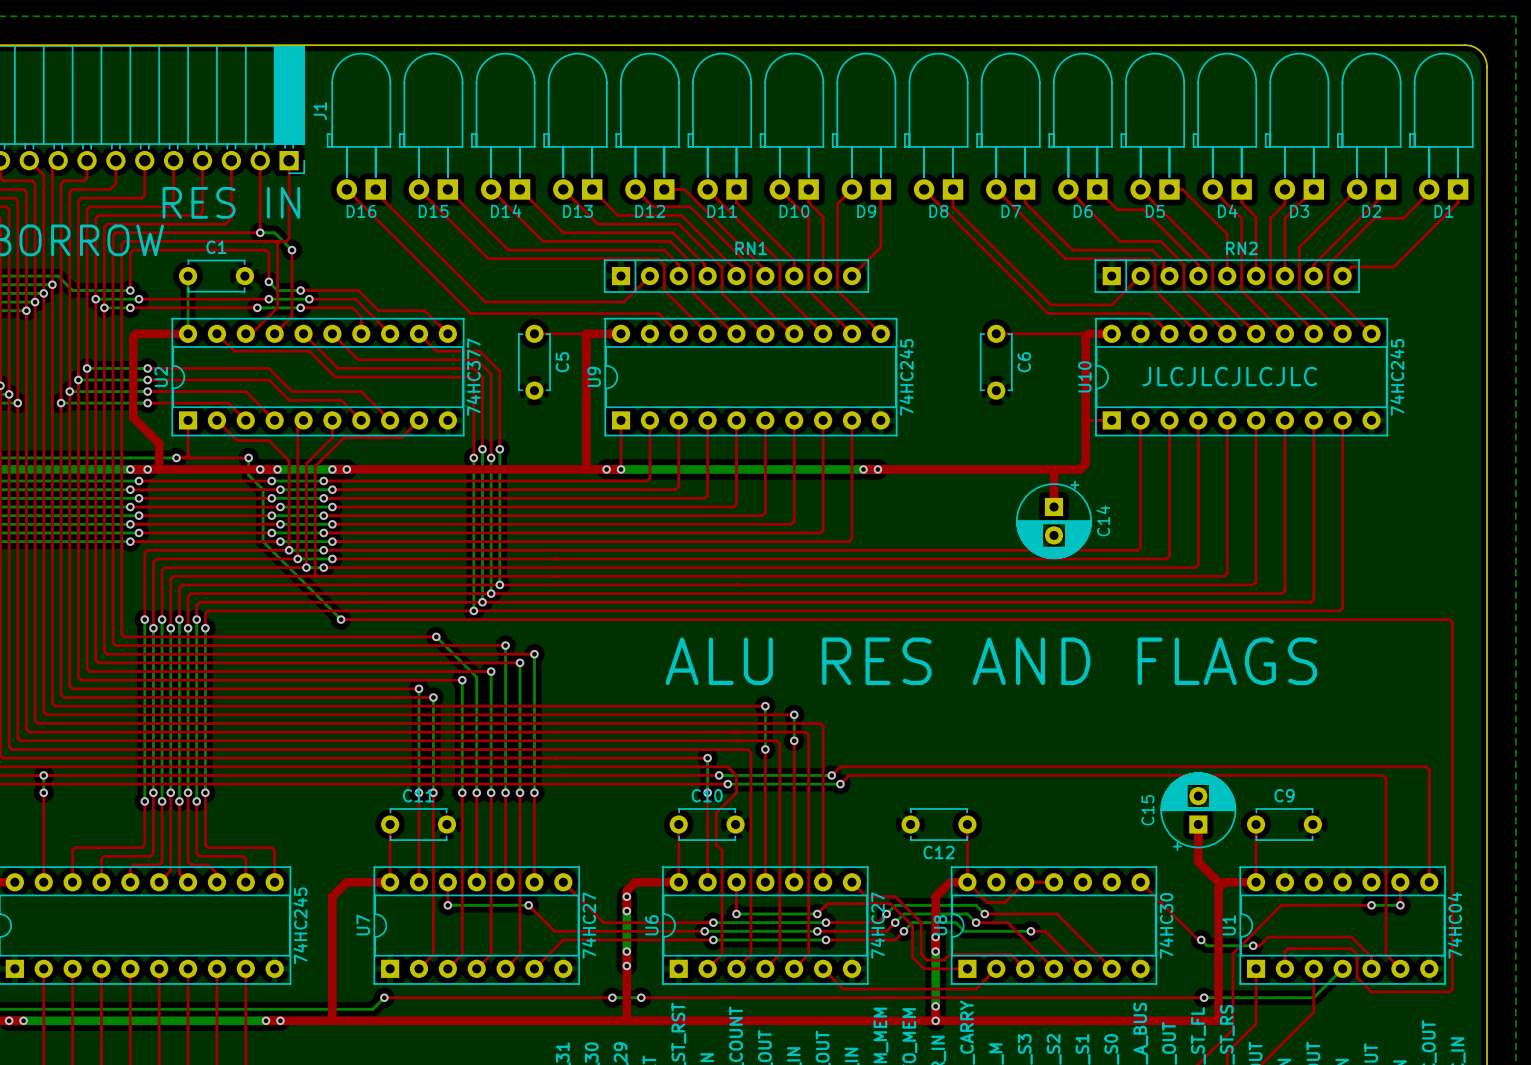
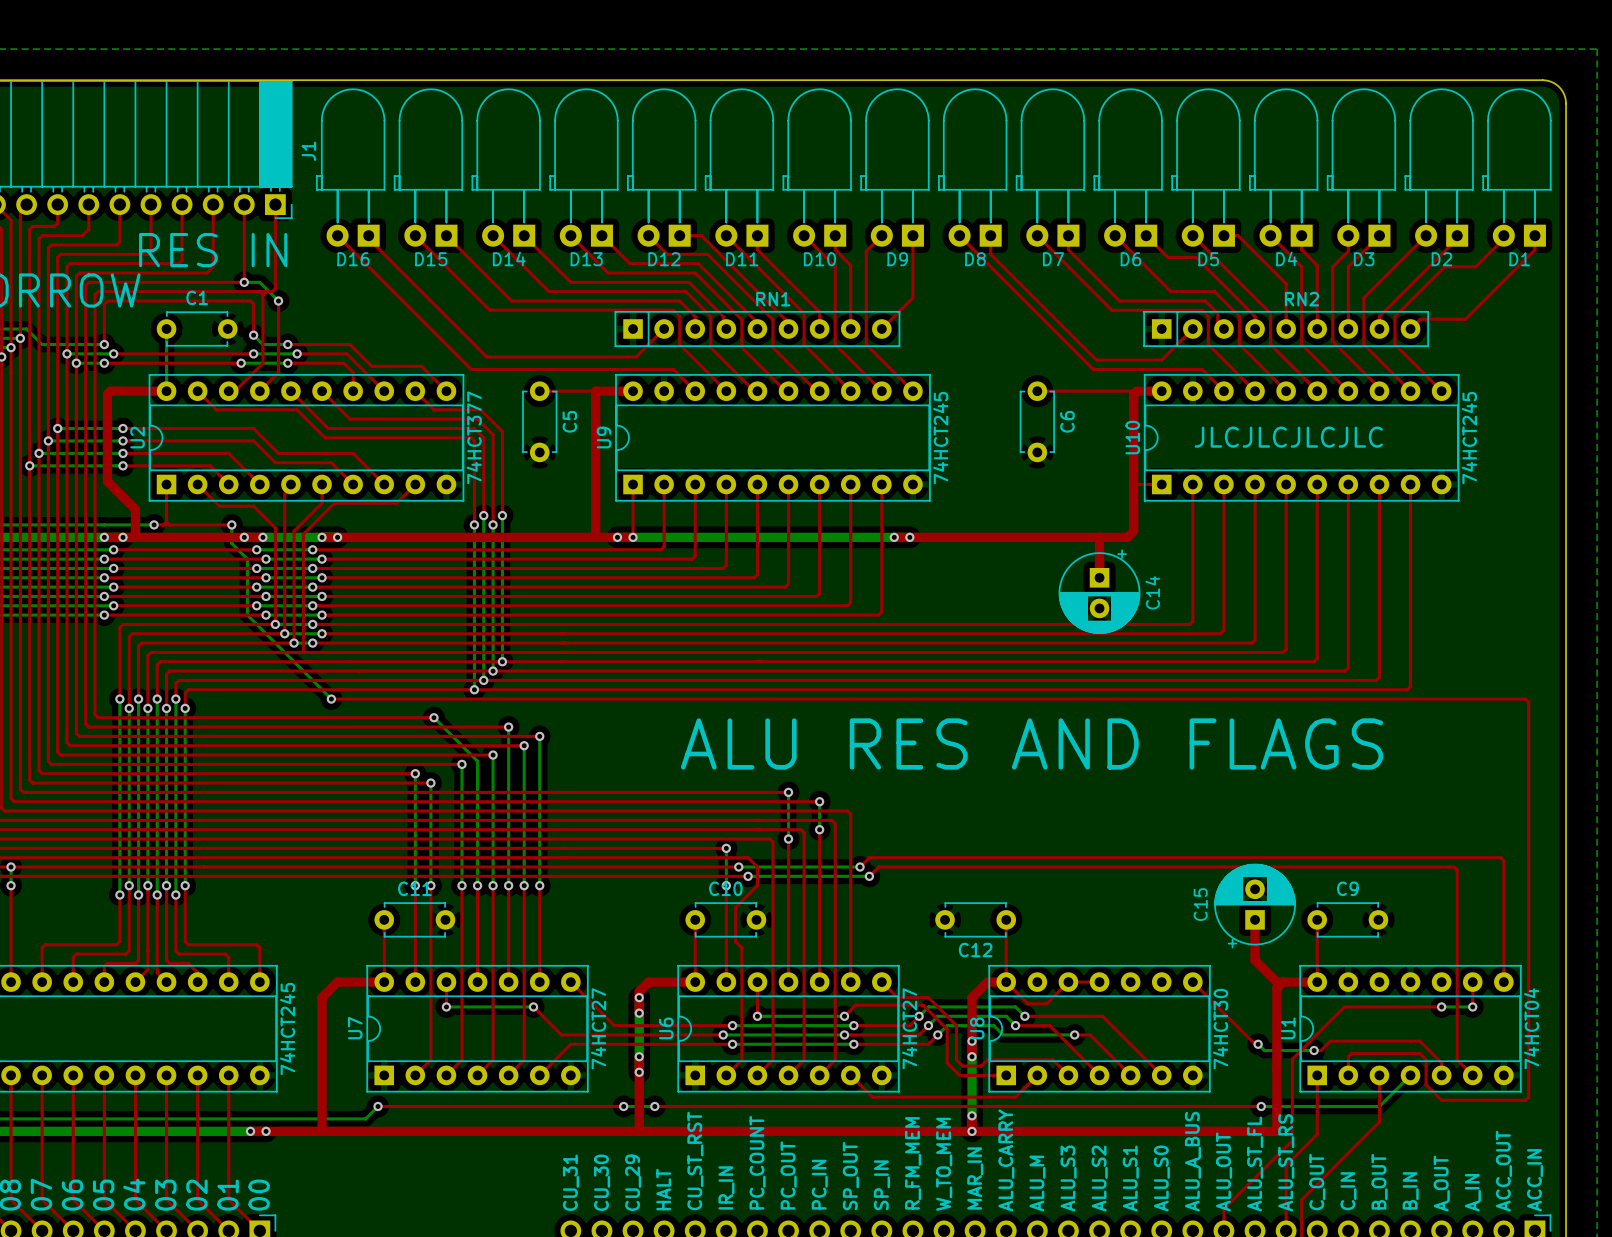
U2 value: 74HC377 (473, 377) -> 74HCT377 (474, 437)
U9 value: 74HC245 (906, 377) -> 74HCT245 (940, 438)
U10 value: 74HC245 (1397, 377) -> 74HCT245 (1469, 438)
part value: 74HC245 (300, 925) -> 74HCT245 (287, 1029)
U7 value: 74HC27 (589, 925) -> 74HCT27 (598, 1028)
U6 value: 74HC27 (877, 925) -> 74HCT27 (909, 1028)
U8 value: 74HC30 (1166, 925) -> 74HCT30 (1220, 1029)
U1 value: 74HC04 (1455, 925) -> 74HCT04 (1531, 1028)

